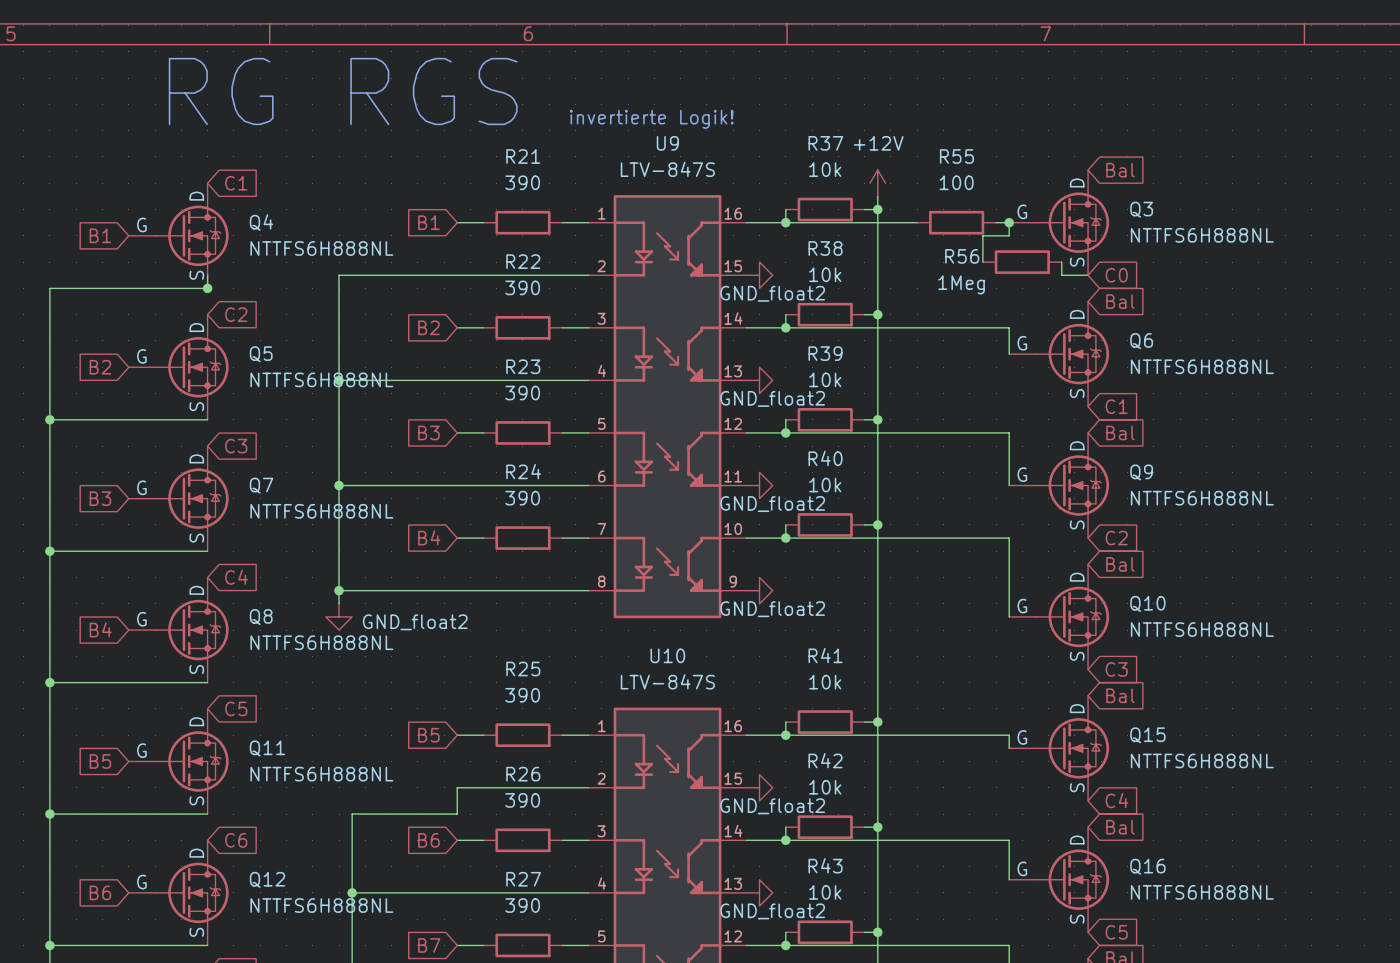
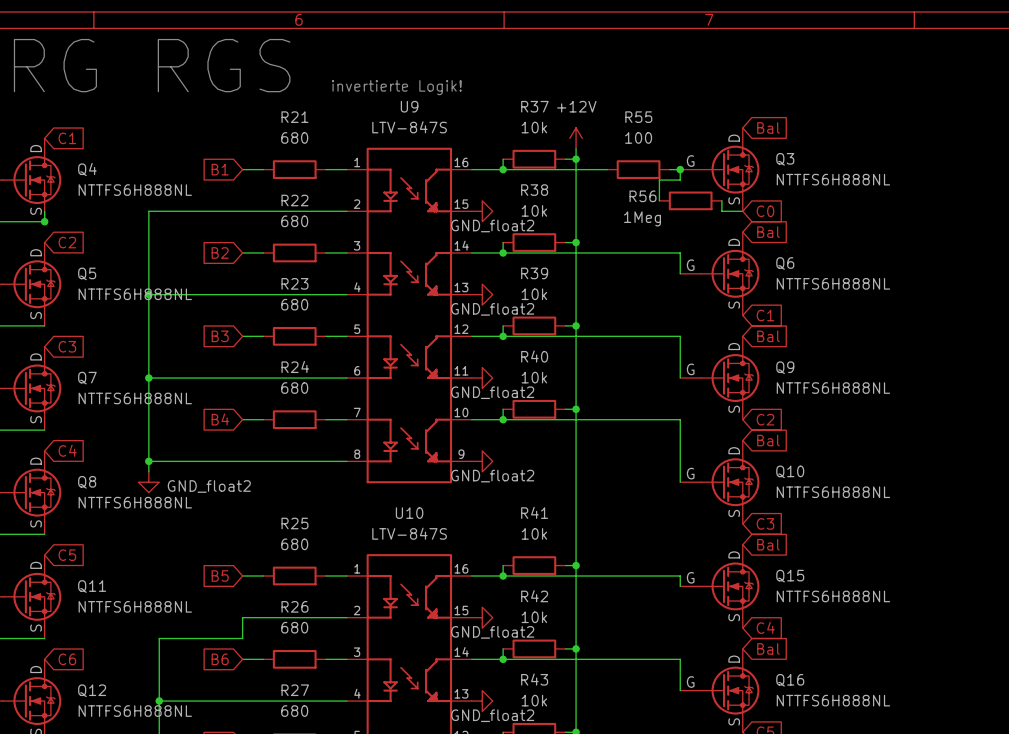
R21 value: 390 (522, 182) -> 680 (294, 137)
R22 value: 390 (522, 287) -> 680 (294, 221)
R23 value: 390 (522, 393) -> 680 (294, 304)
R24 value: 390 (522, 498) -> 680 (294, 388)
R25 value: 390 (522, 695) -> 680 (294, 544)
R26 value: 390 (522, 800) -> 680 (294, 627)
R27 value: 390 (522, 905) -> 680 (294, 711)

